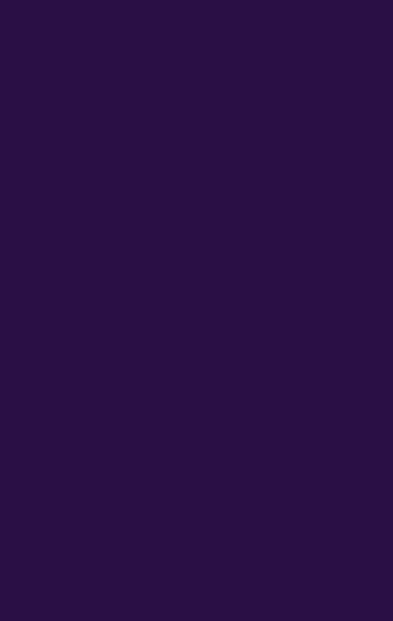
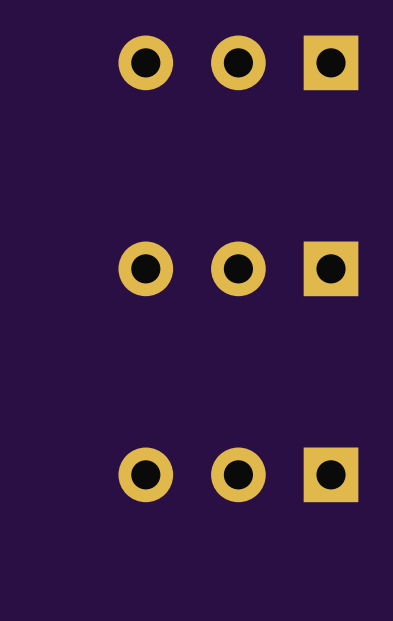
part: none -> (238, 62)
part: none -> (238, 268)
part: none -> (238, 474)

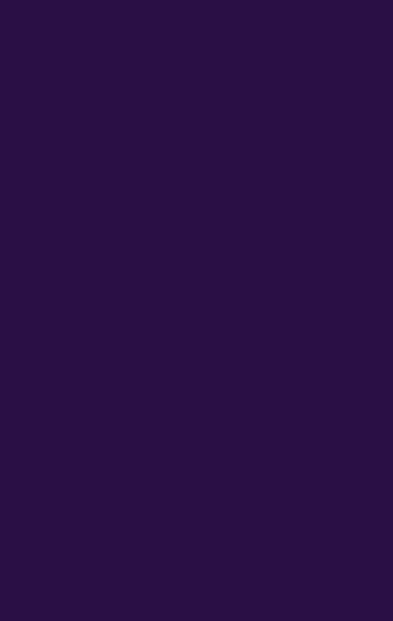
part: (238, 62) -> none
part: (238, 268) -> none
part: (238, 474) -> none

